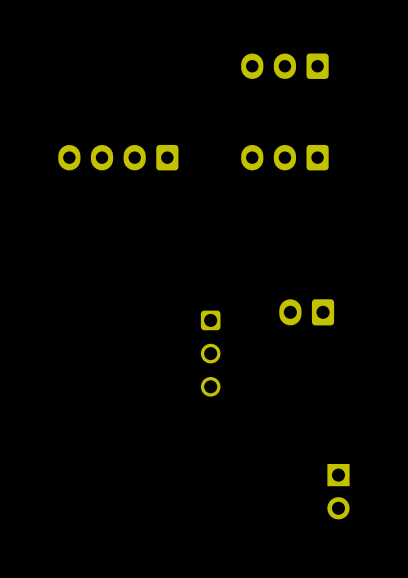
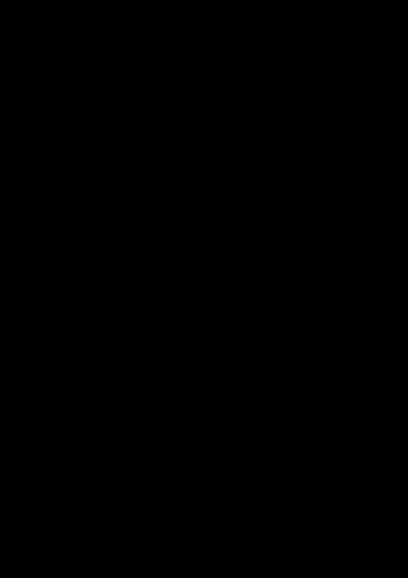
part: (284, 66) -> none
part: (118, 157) -> none
part: (284, 157) -> none
part: (306, 312) -> none
part: (210, 353) -> none
part: (338, 491) -> none

